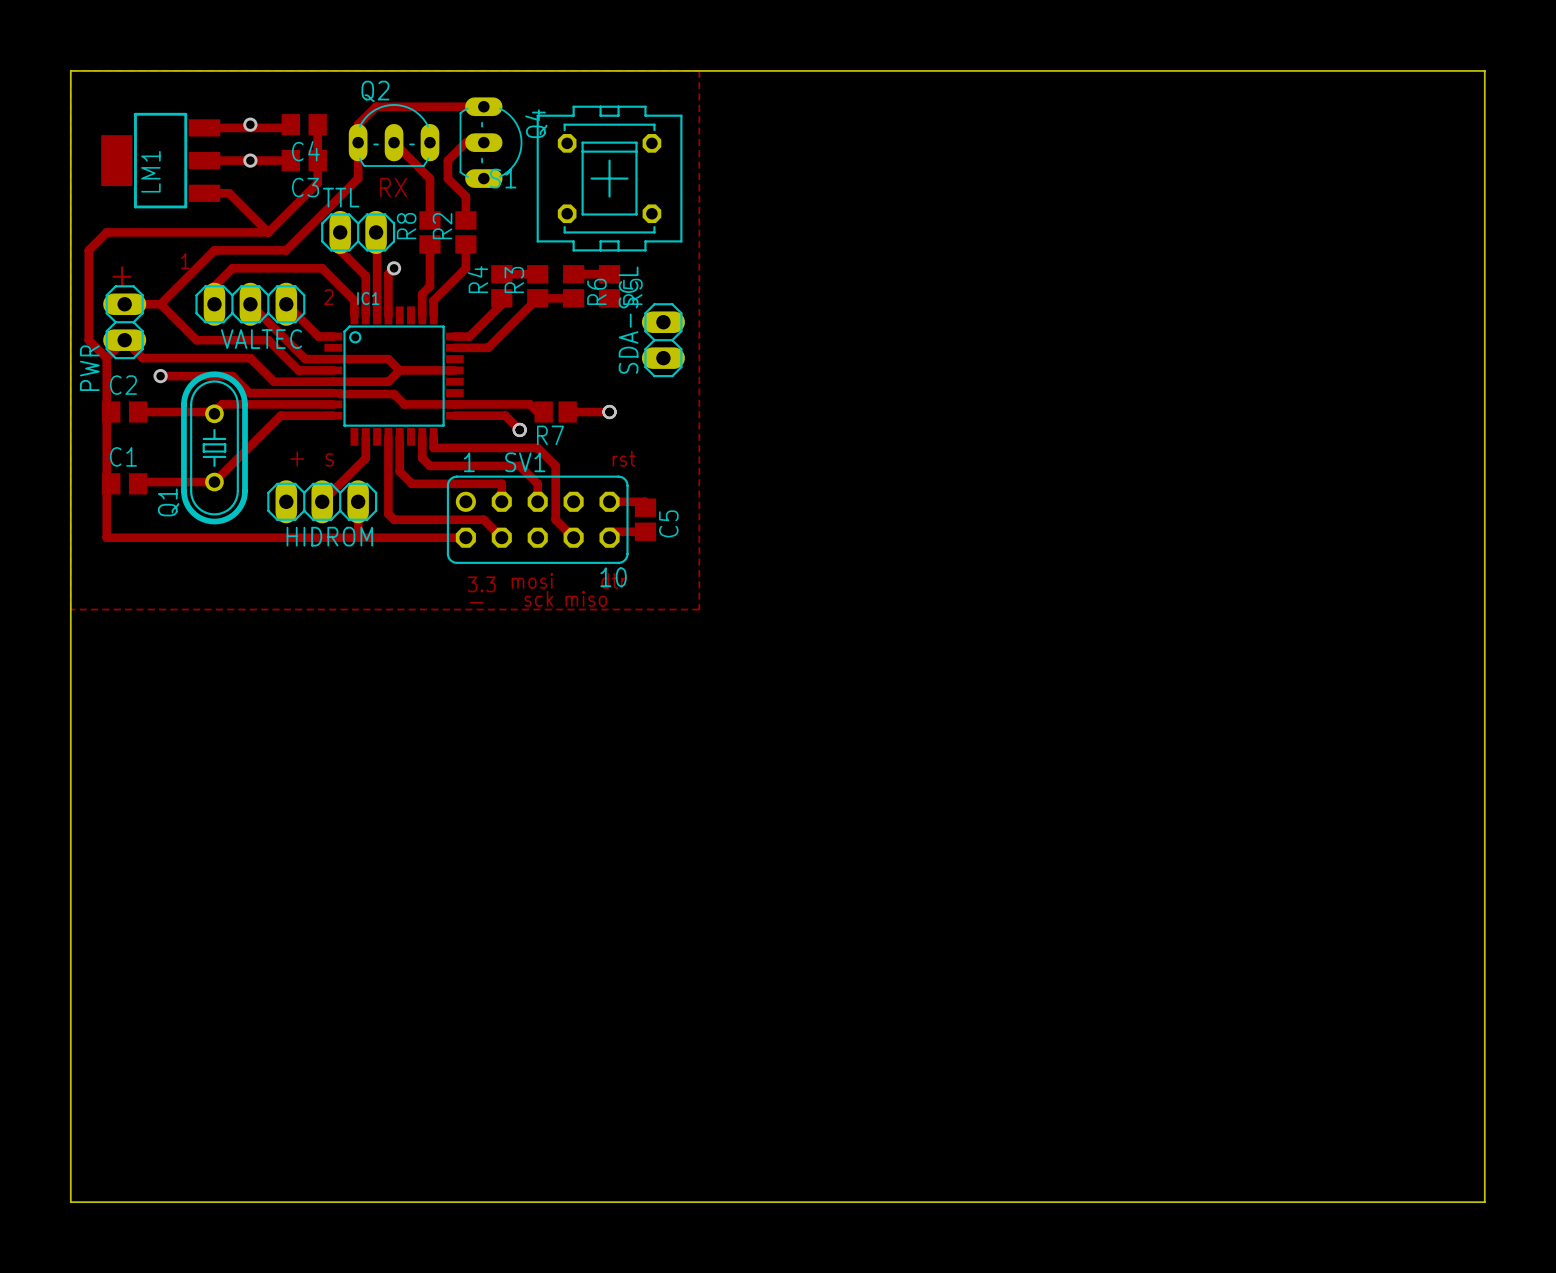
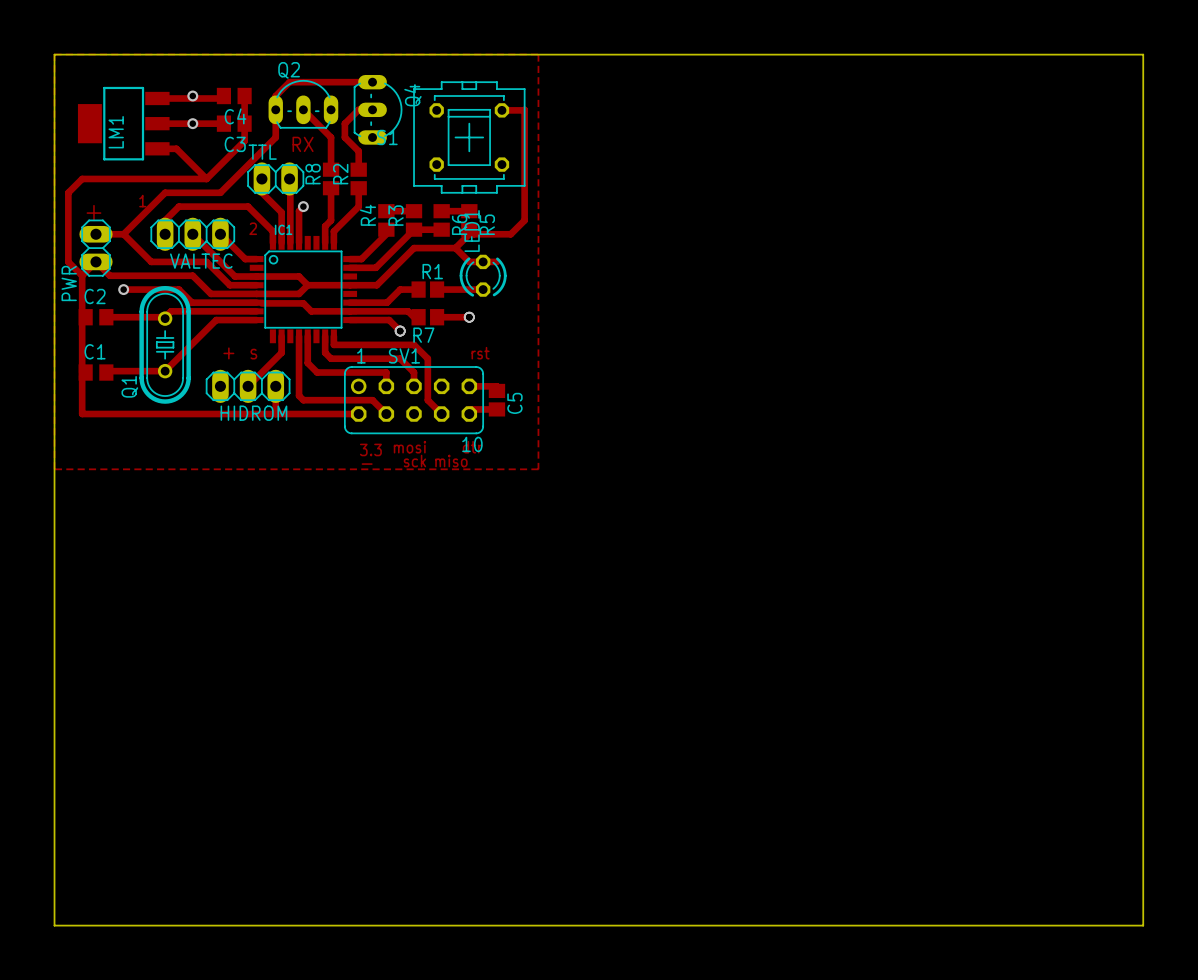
track: none -> (501, 110) (524, 109) (524, 220) (510, 234) (473, 234) (469, 229)
track: none -> (469, 234) (455, 248)
track: none -> (455, 248) (469, 261) (496, 261)
track: none -> (455, 248) (414, 248) (376, 285) (350, 285)
SDA-SCL: (663, 340) -> none
LED1: none -> (483, 275)
track: none -> (418, 289) (400, 289) (387, 302) (350, 302)
R1: none -> (427, 289)
track: none -> (437, 289) (483, 289)

